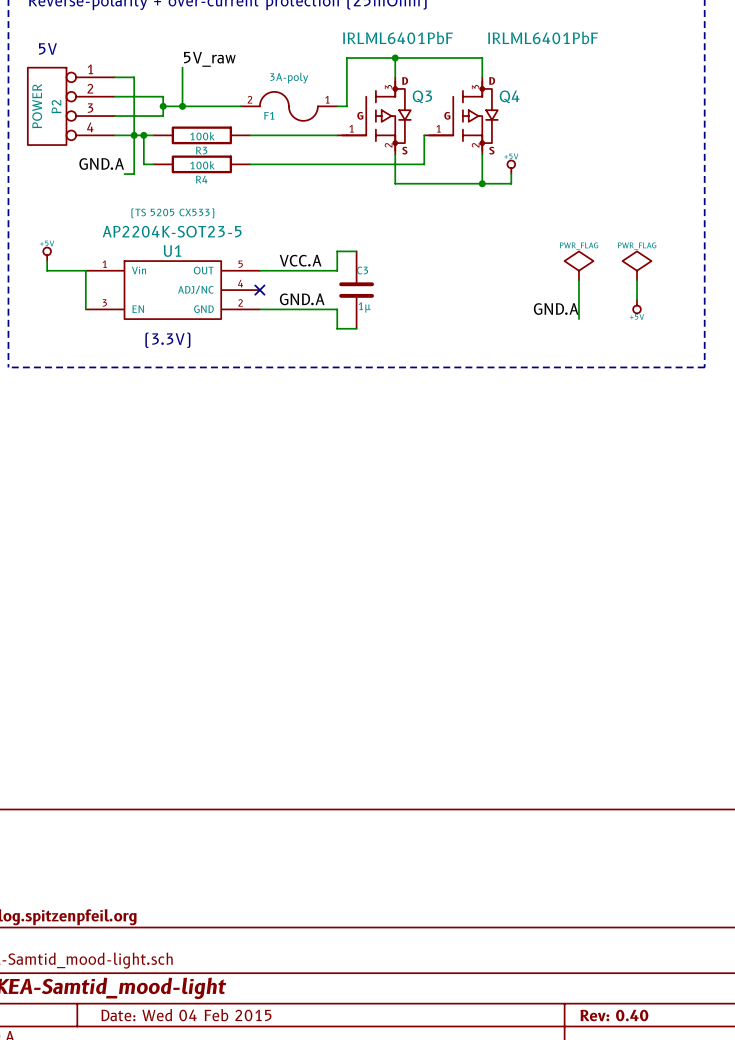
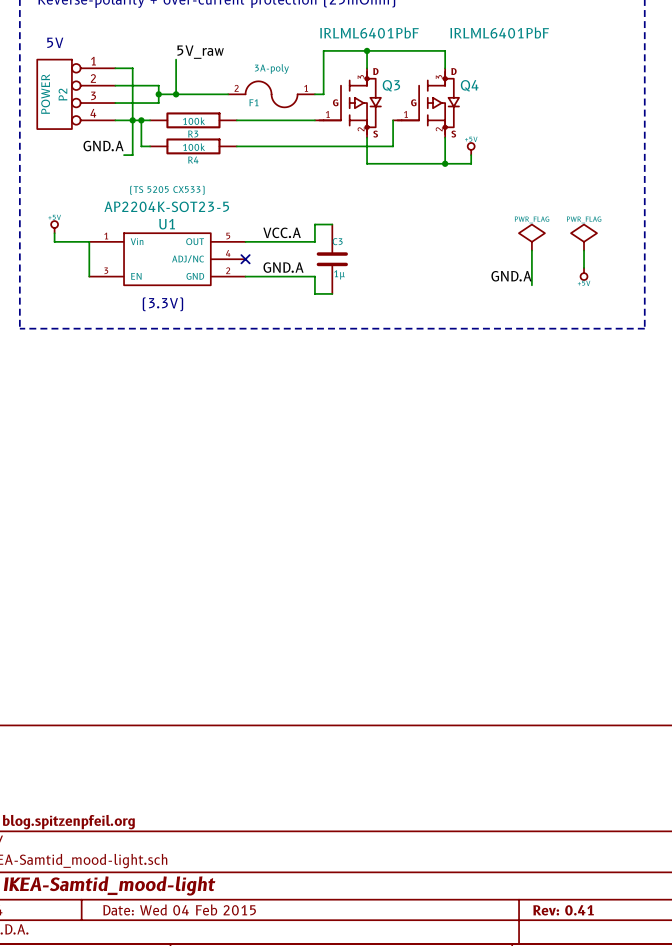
title block: Rev: 0.40 (614, 1015) -> Rev: 0.41 (563, 910)

